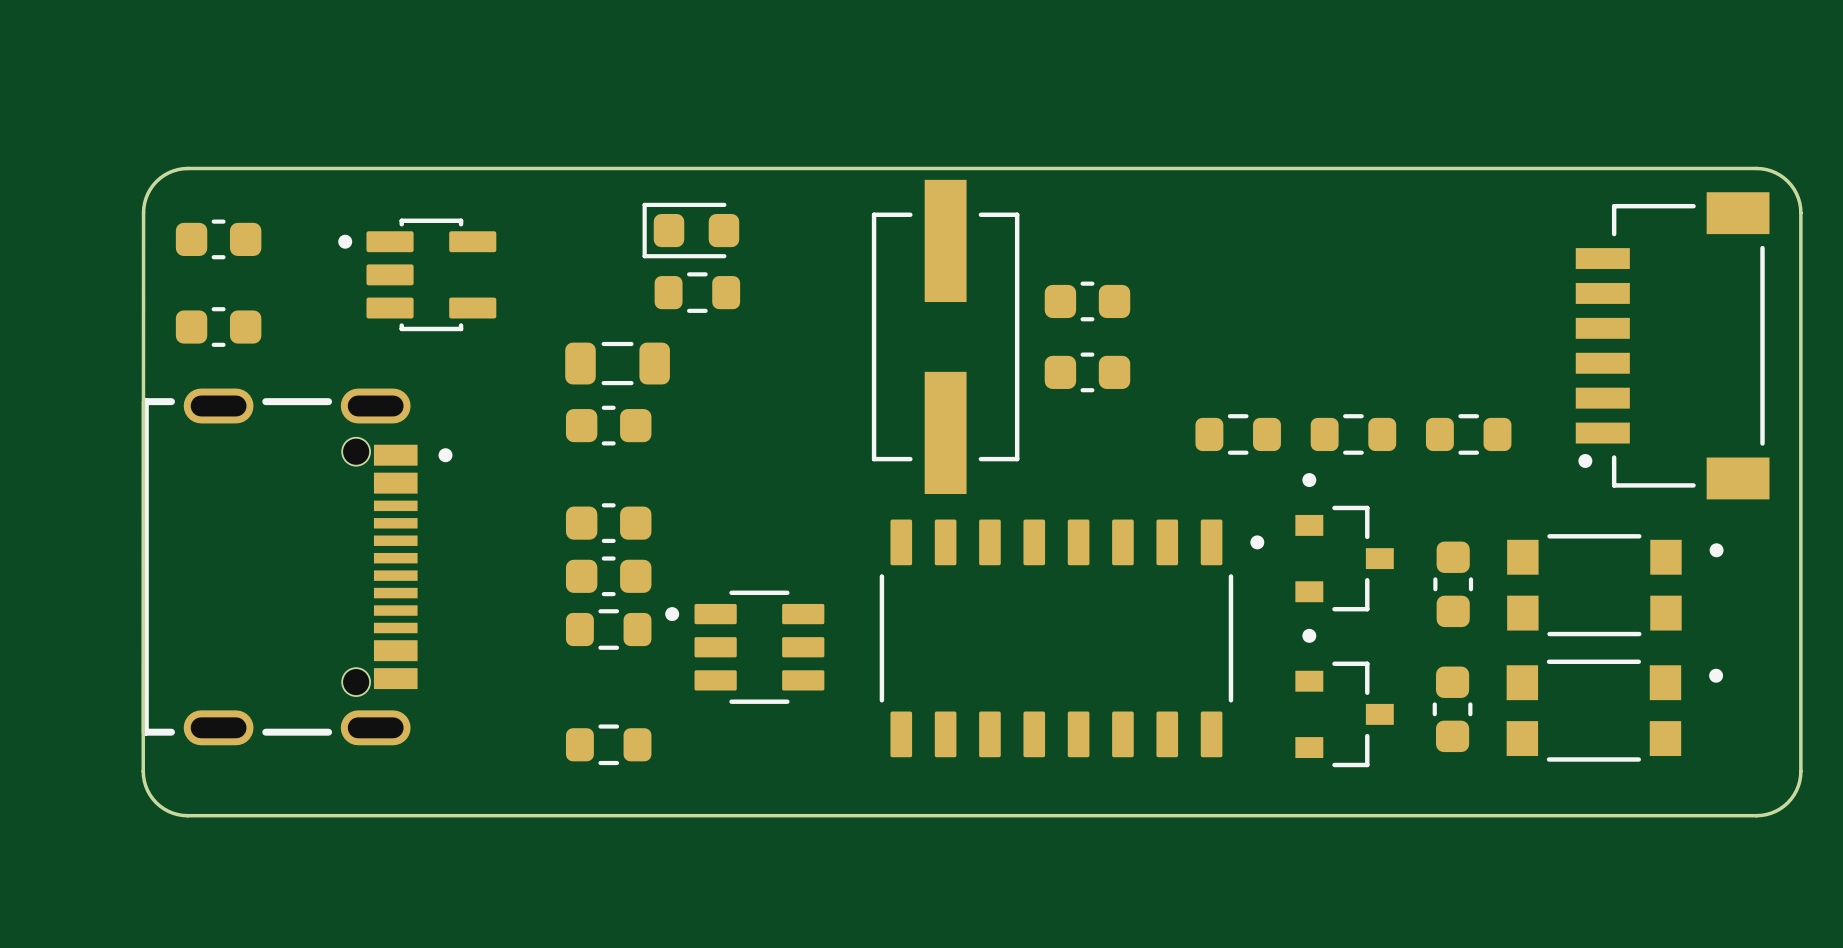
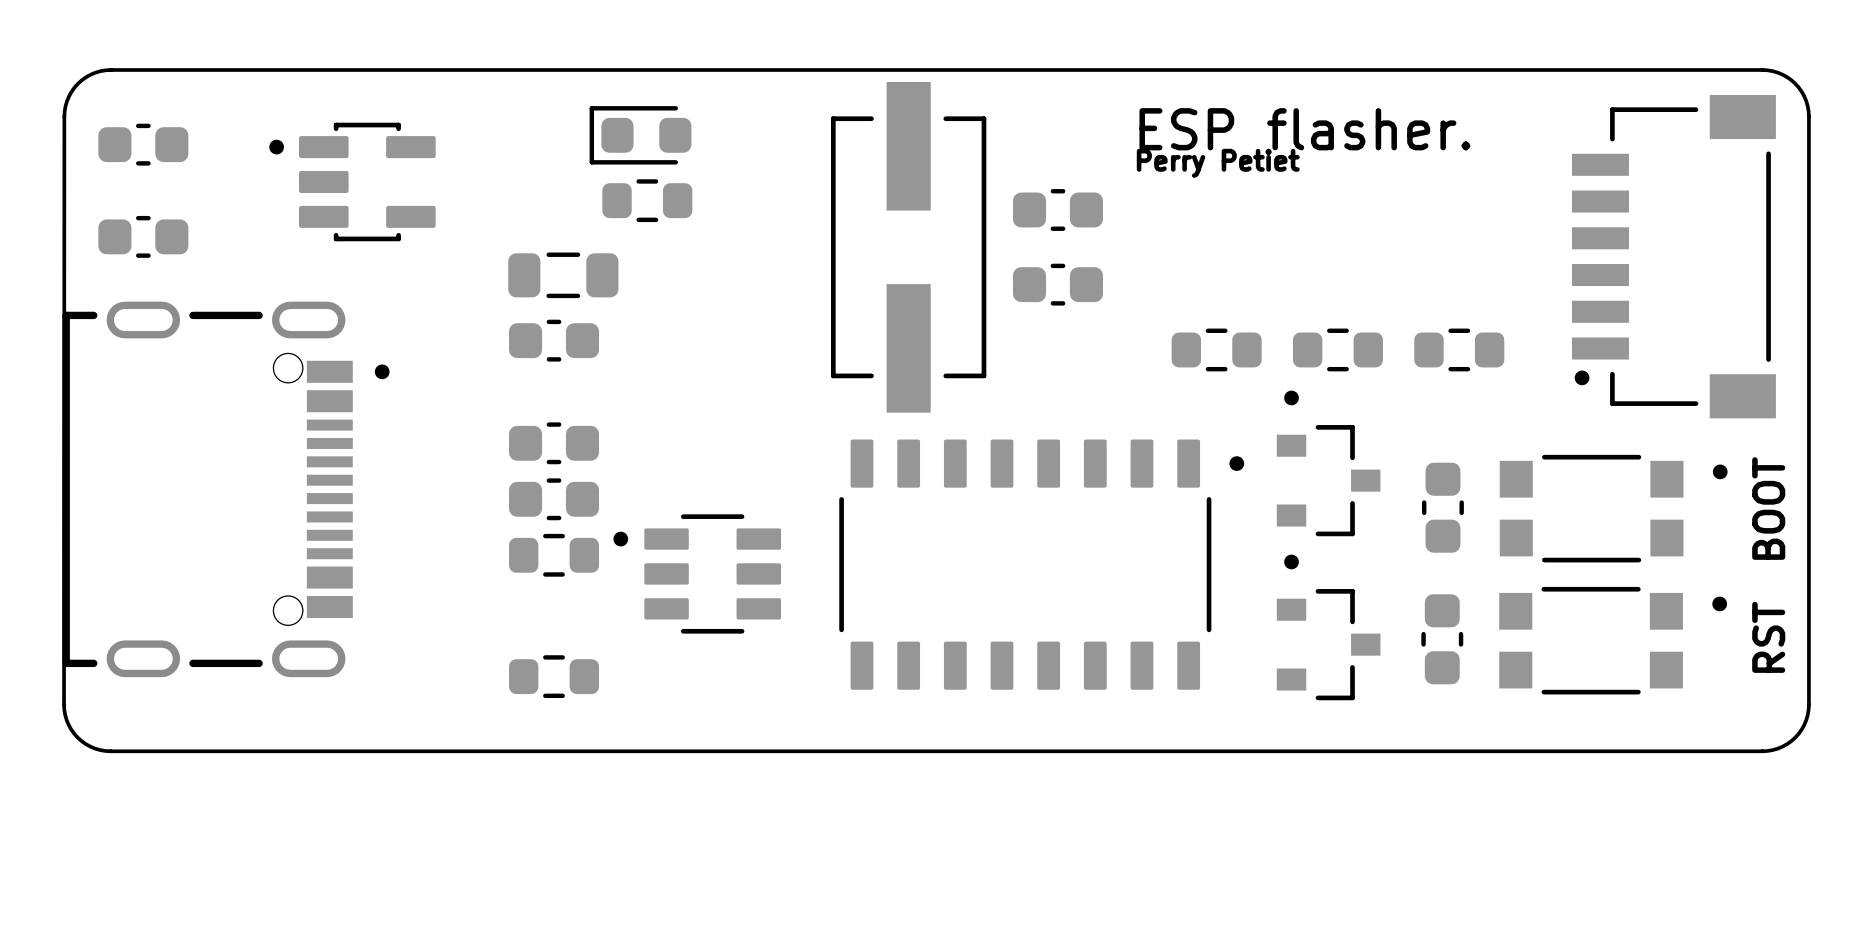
text: none -> ESP flasher. (1304, 129)
text: none -> Perry Petiet (1218, 163)
text: none -> BOOT (1768, 508)
text: none -> RST (1768, 637)

